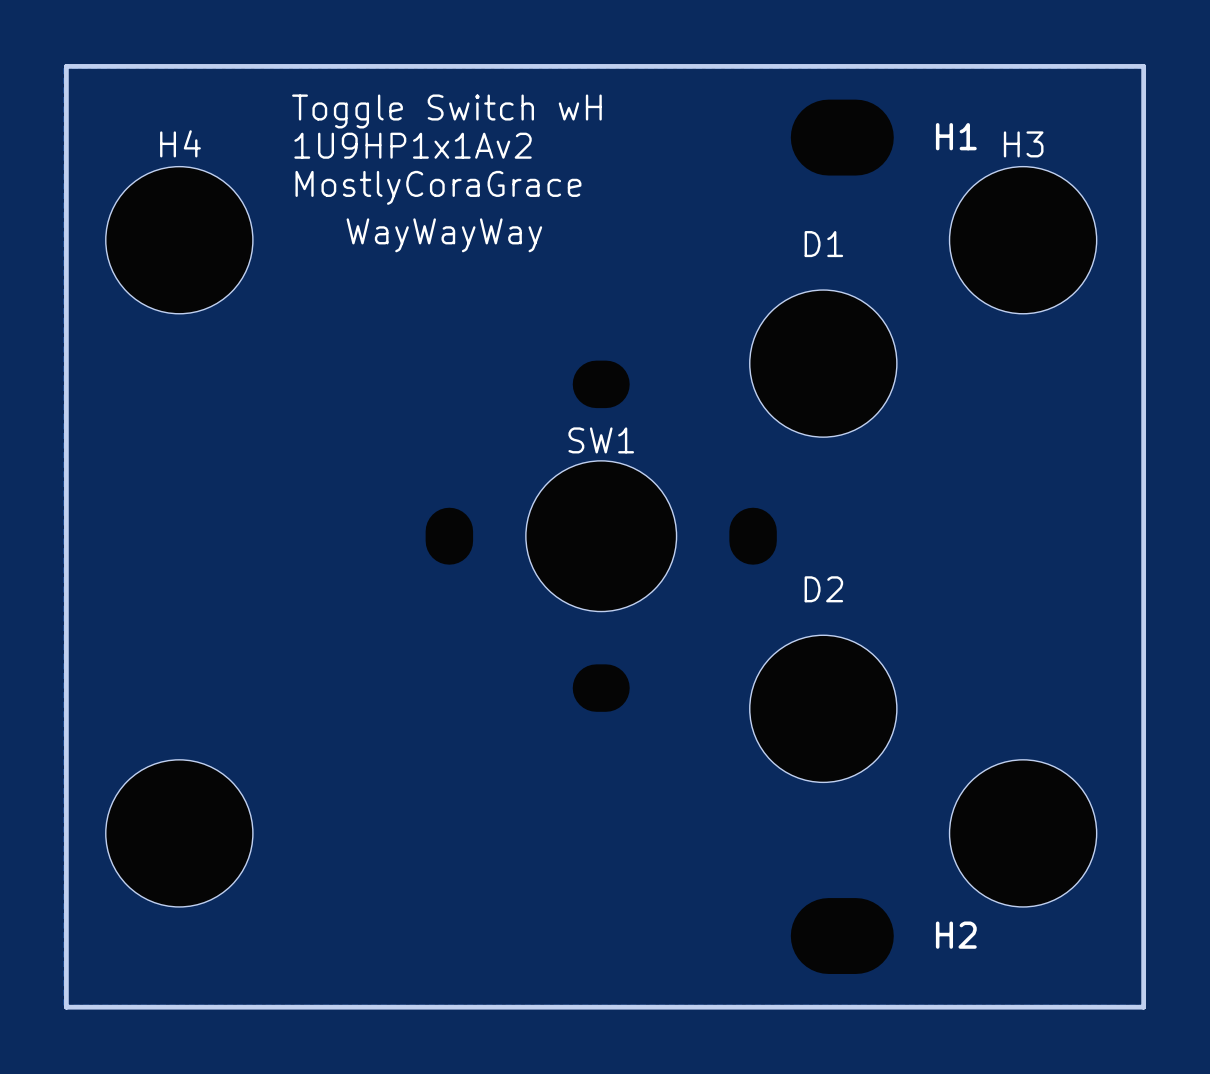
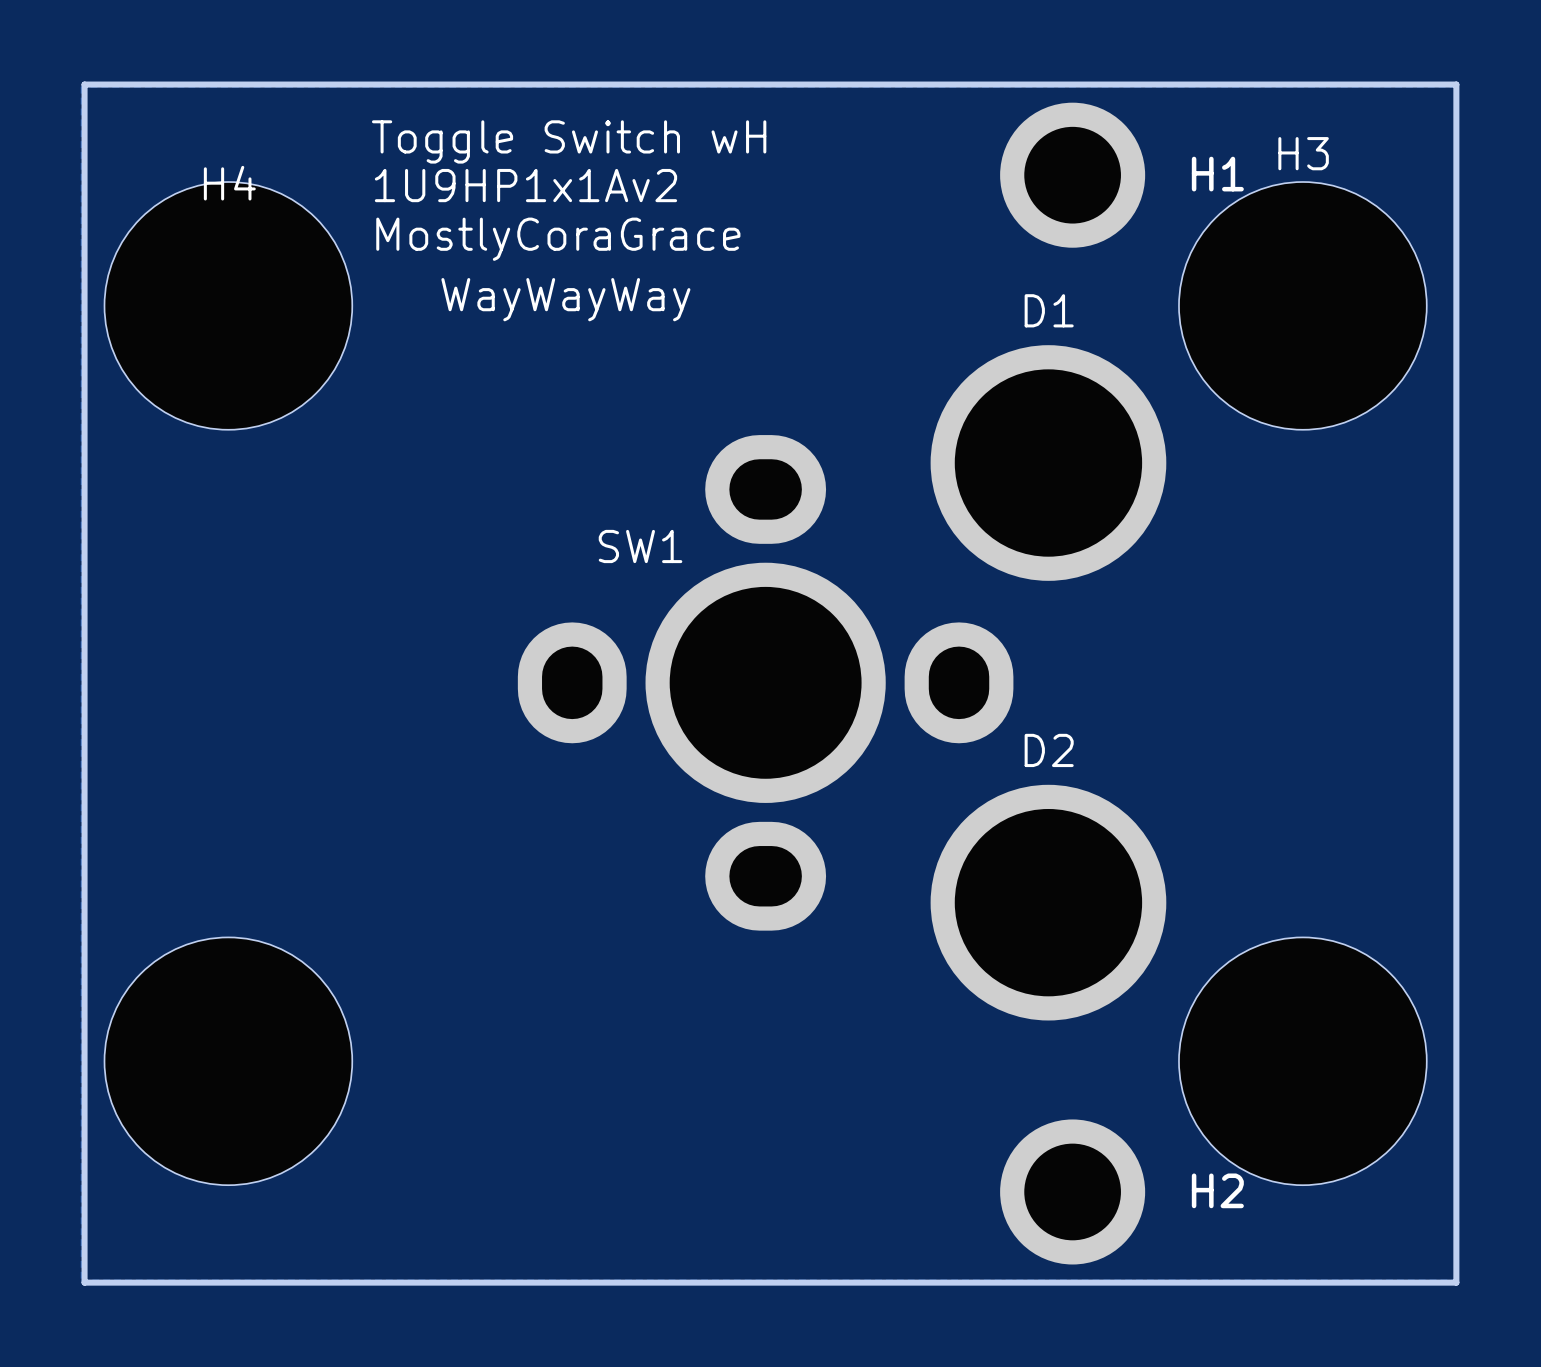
H1 footprint: [790, 99, 894, 176] -> [1000, 102, 1146, 248]
H4 footprint: [105, 166, 253, 907] -> [104, 182, 353, 1186]
H3 footprint: [949, 166, 1097, 907] -> [1178, 182, 1427, 1186]
D1 footprint: [749, 290, 897, 438] -> [930, 345, 1167, 581]
SW1 footprint: [425, 360, 777, 712] -> [517, 435, 1014, 931]
SW1 name position: SW1 (601, 440) -> SW1 (640, 546)
D2 footprint: [749, 635, 897, 783] -> [930, 784, 1167, 1021]
H2 footprint: [790, 898, 894, 974] -> [1000, 1119, 1146, 1265]

